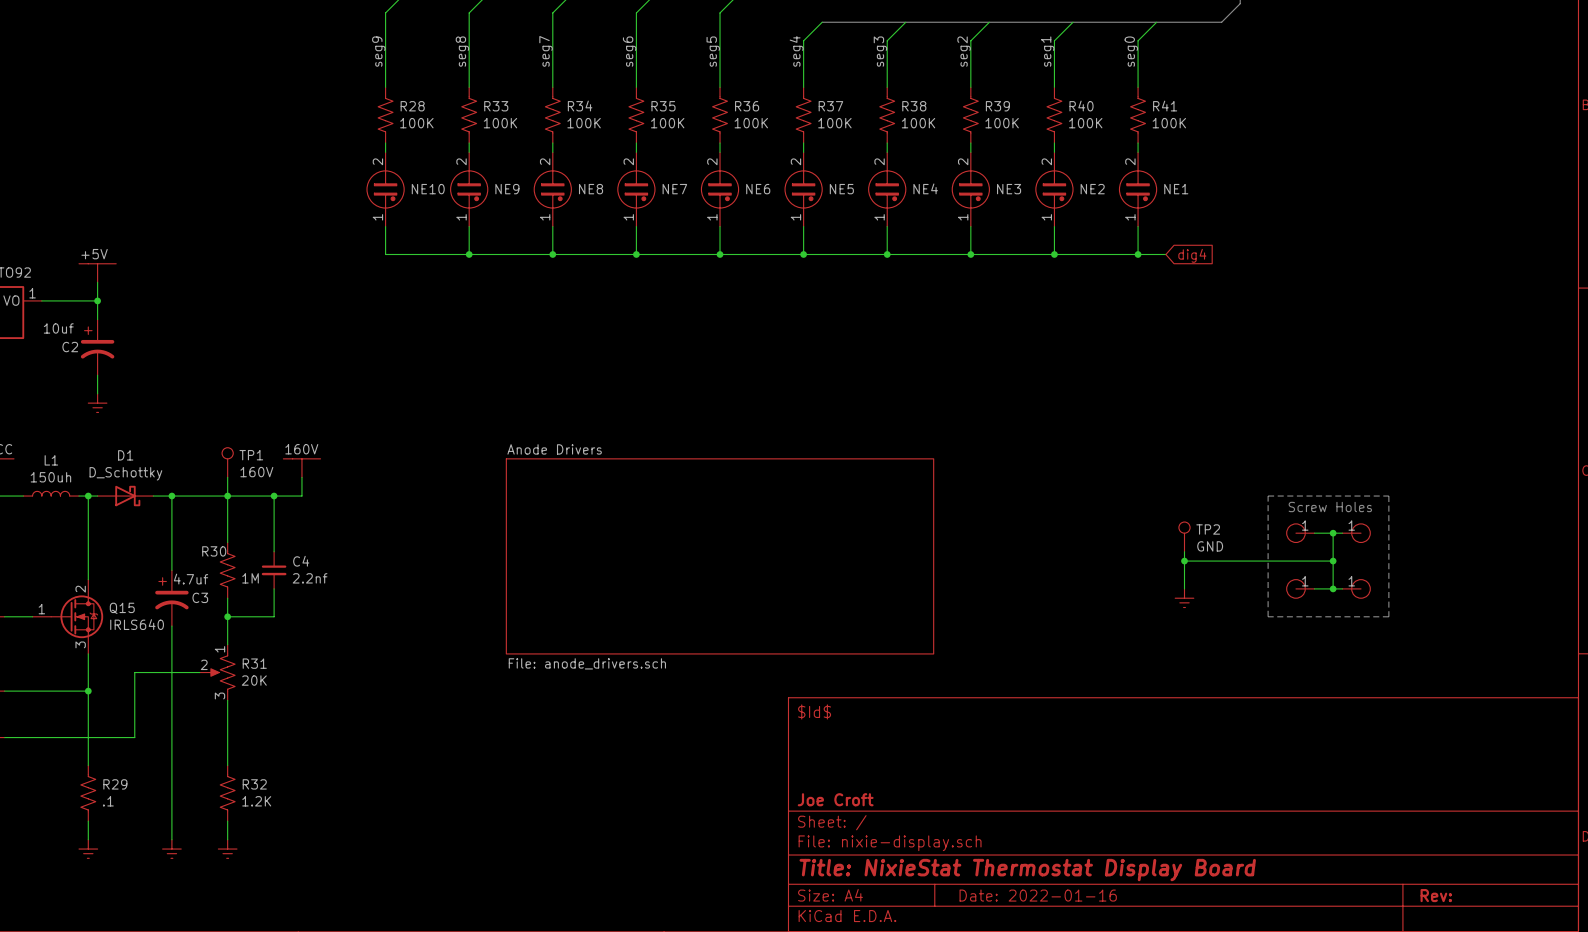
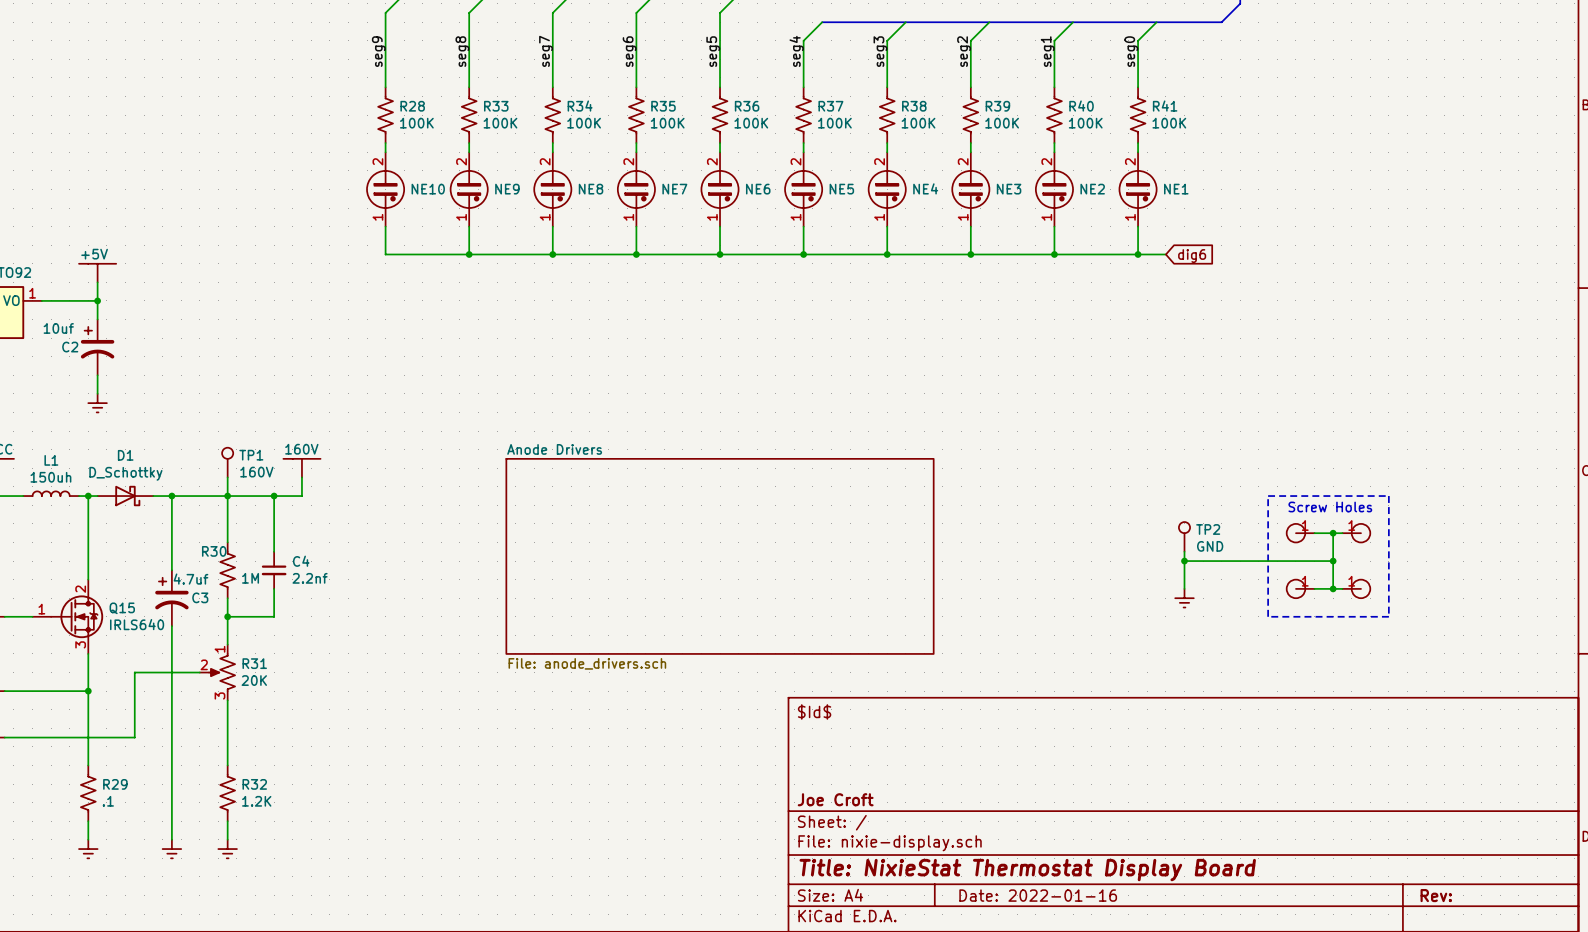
global label: dig4 (1192, 255) -> dig6 (1192, 256)

